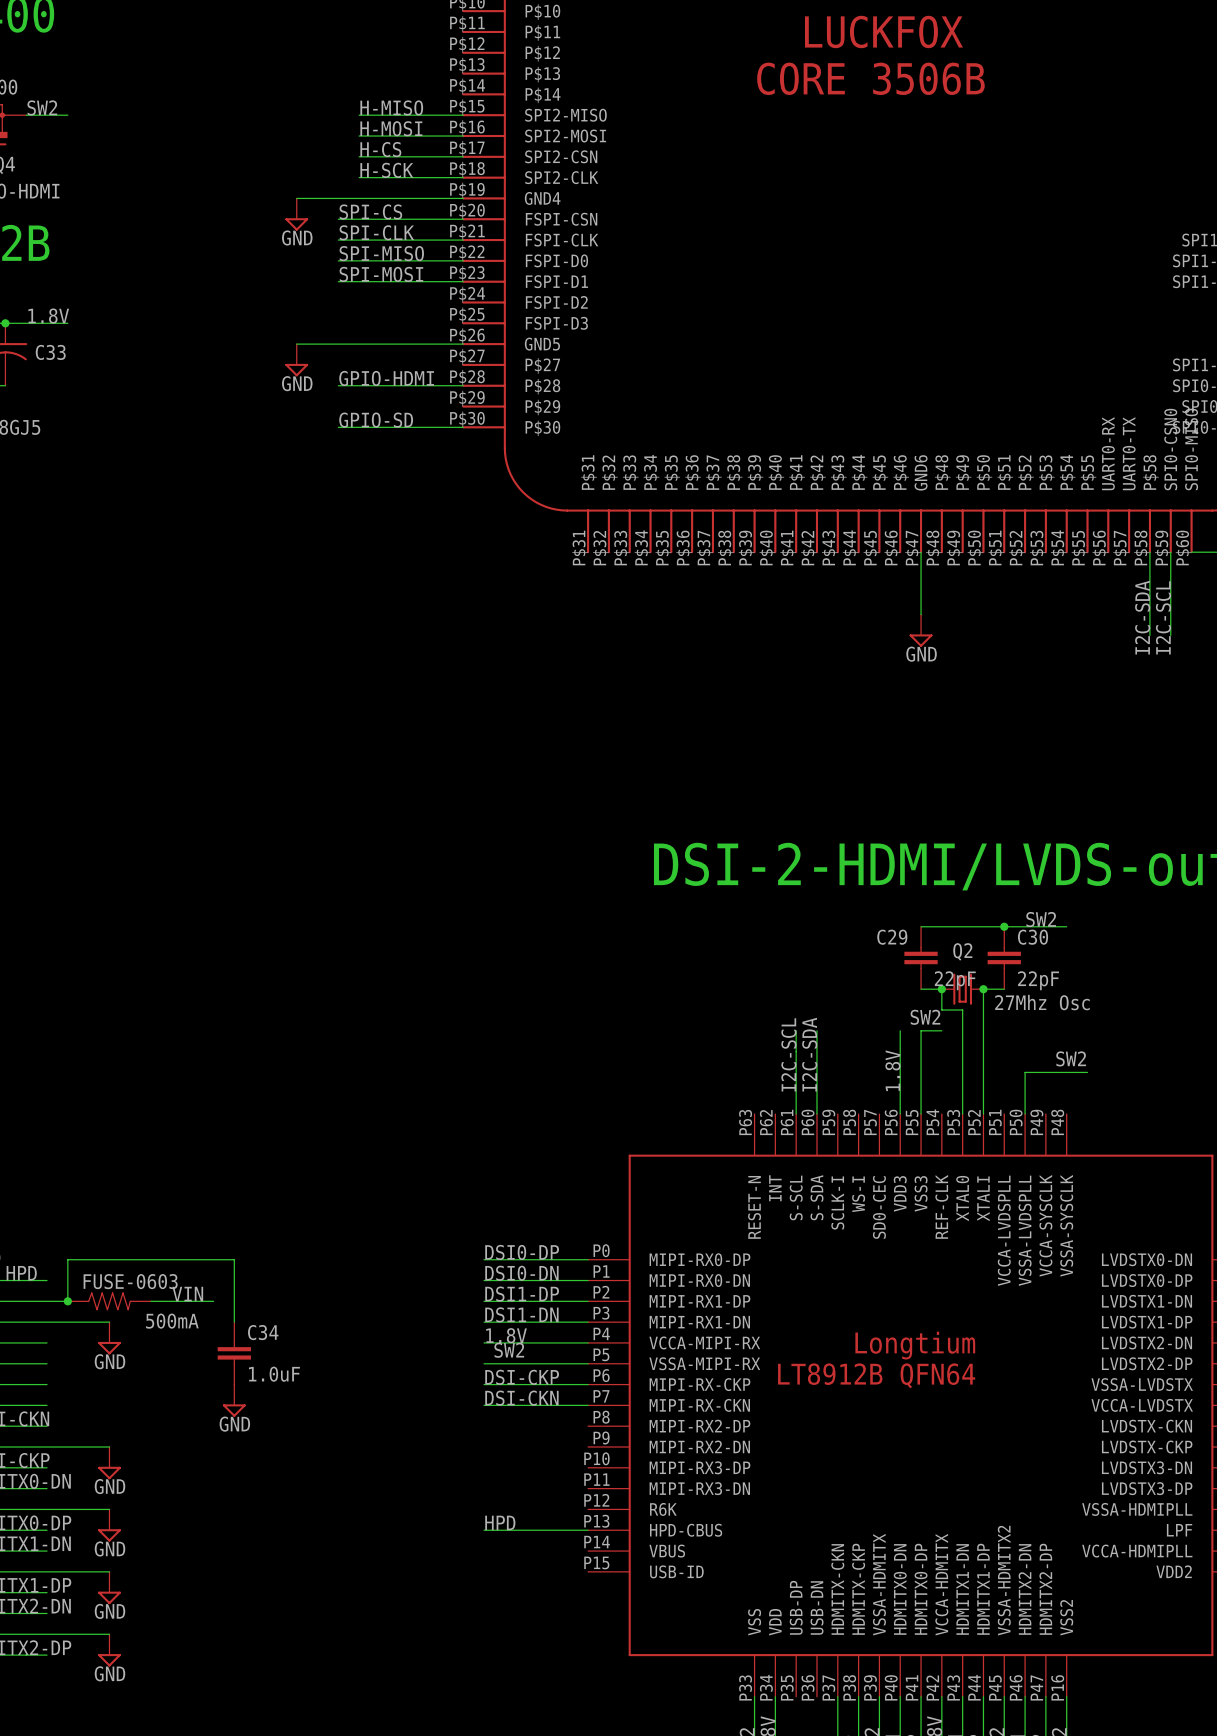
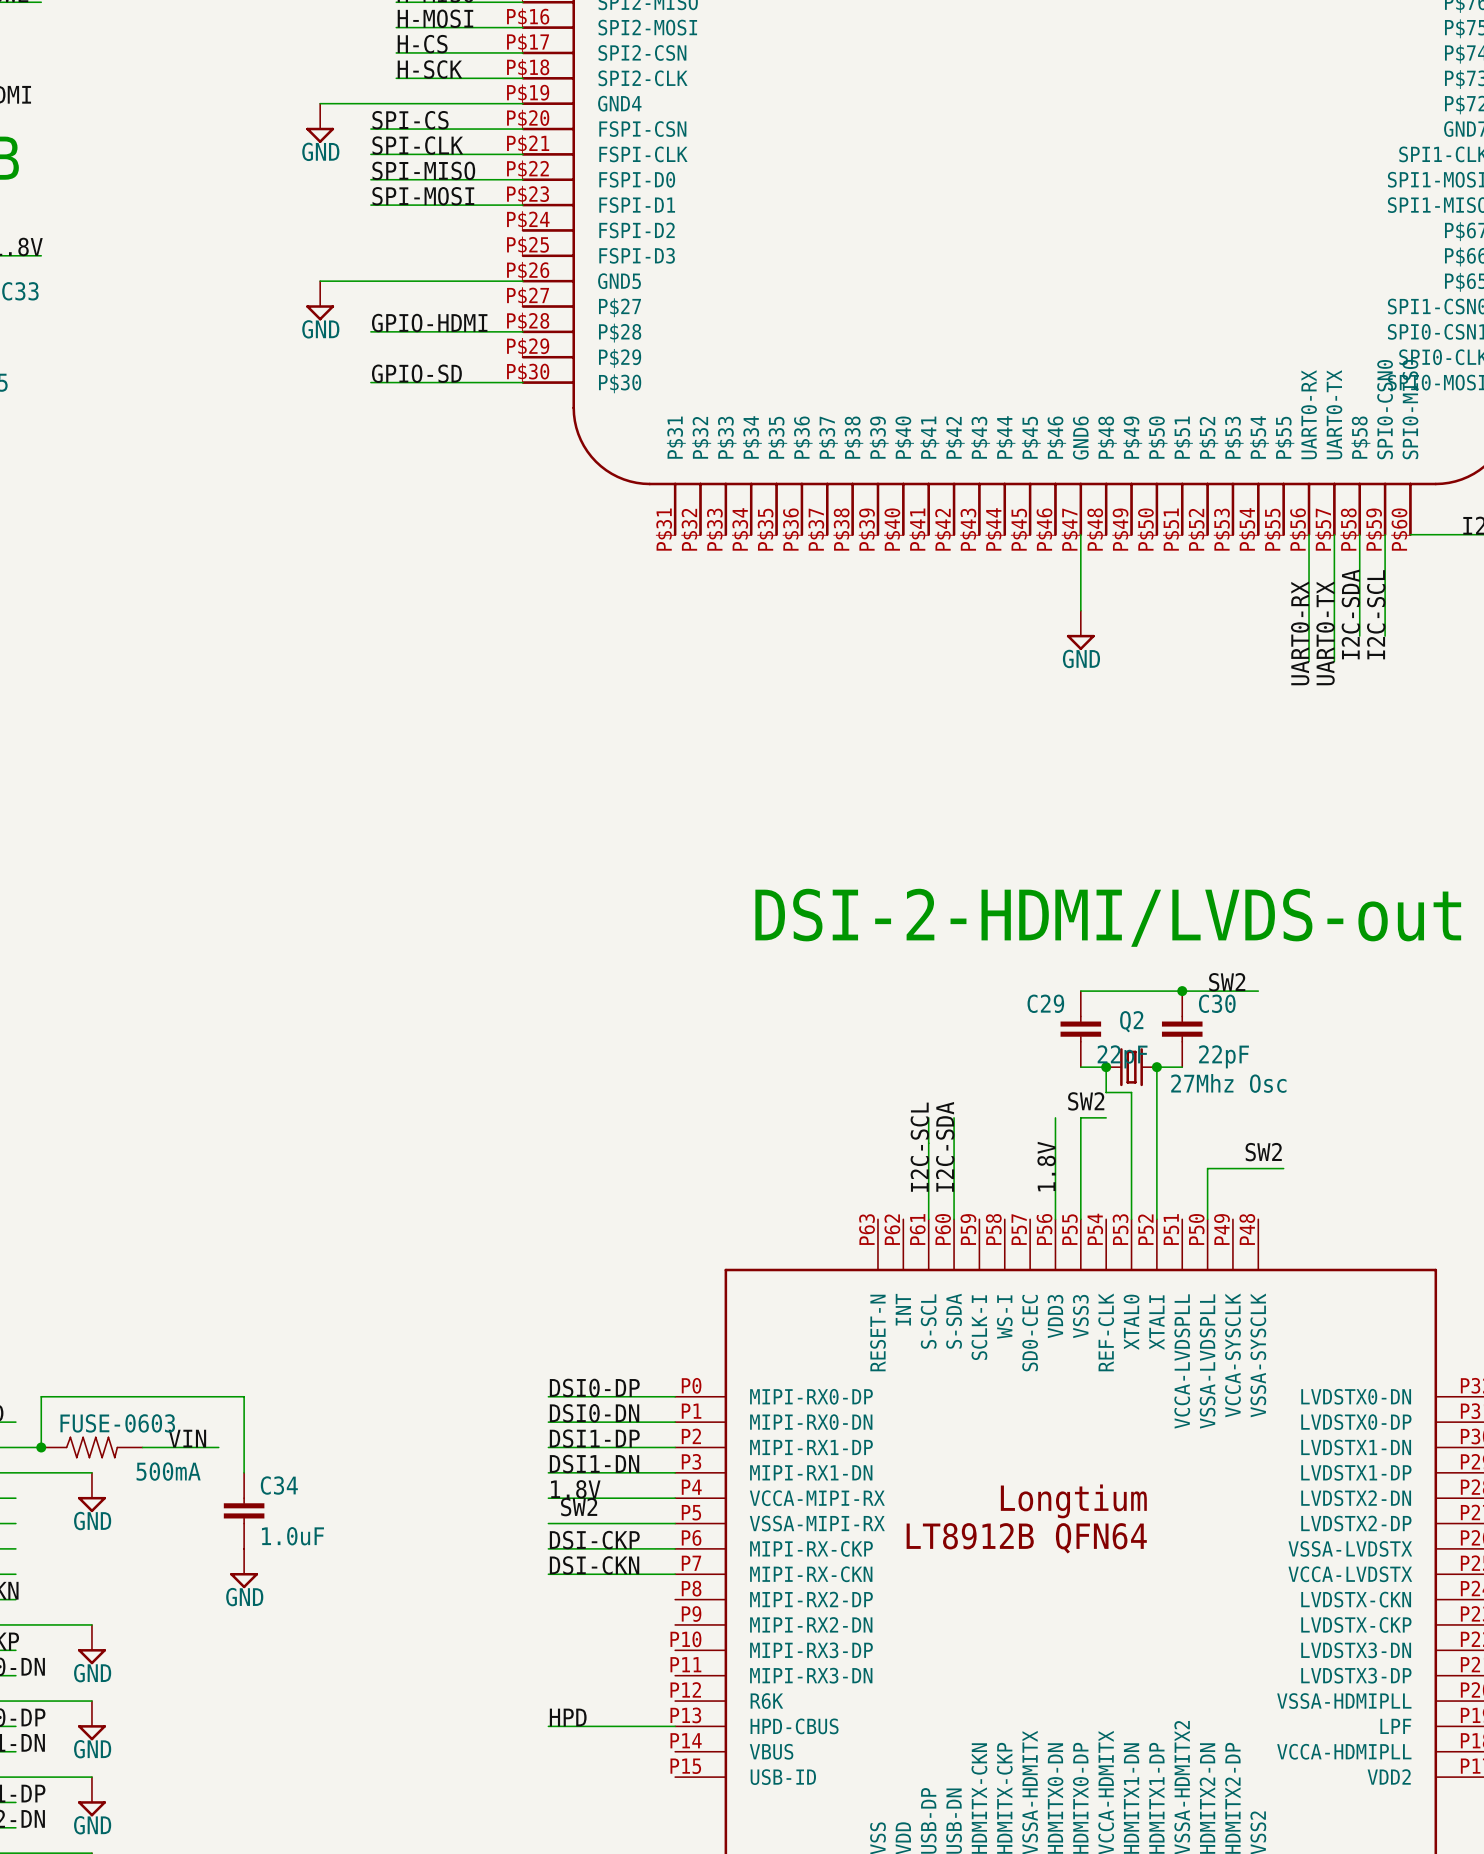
wire: none -> (1309, 534) (1309, 661)
wire: none -> (1334, 534) (1334, 661)
label: none -> UART0-RX (1300, 633)
label: none -> UART0-TX (1325, 633)

